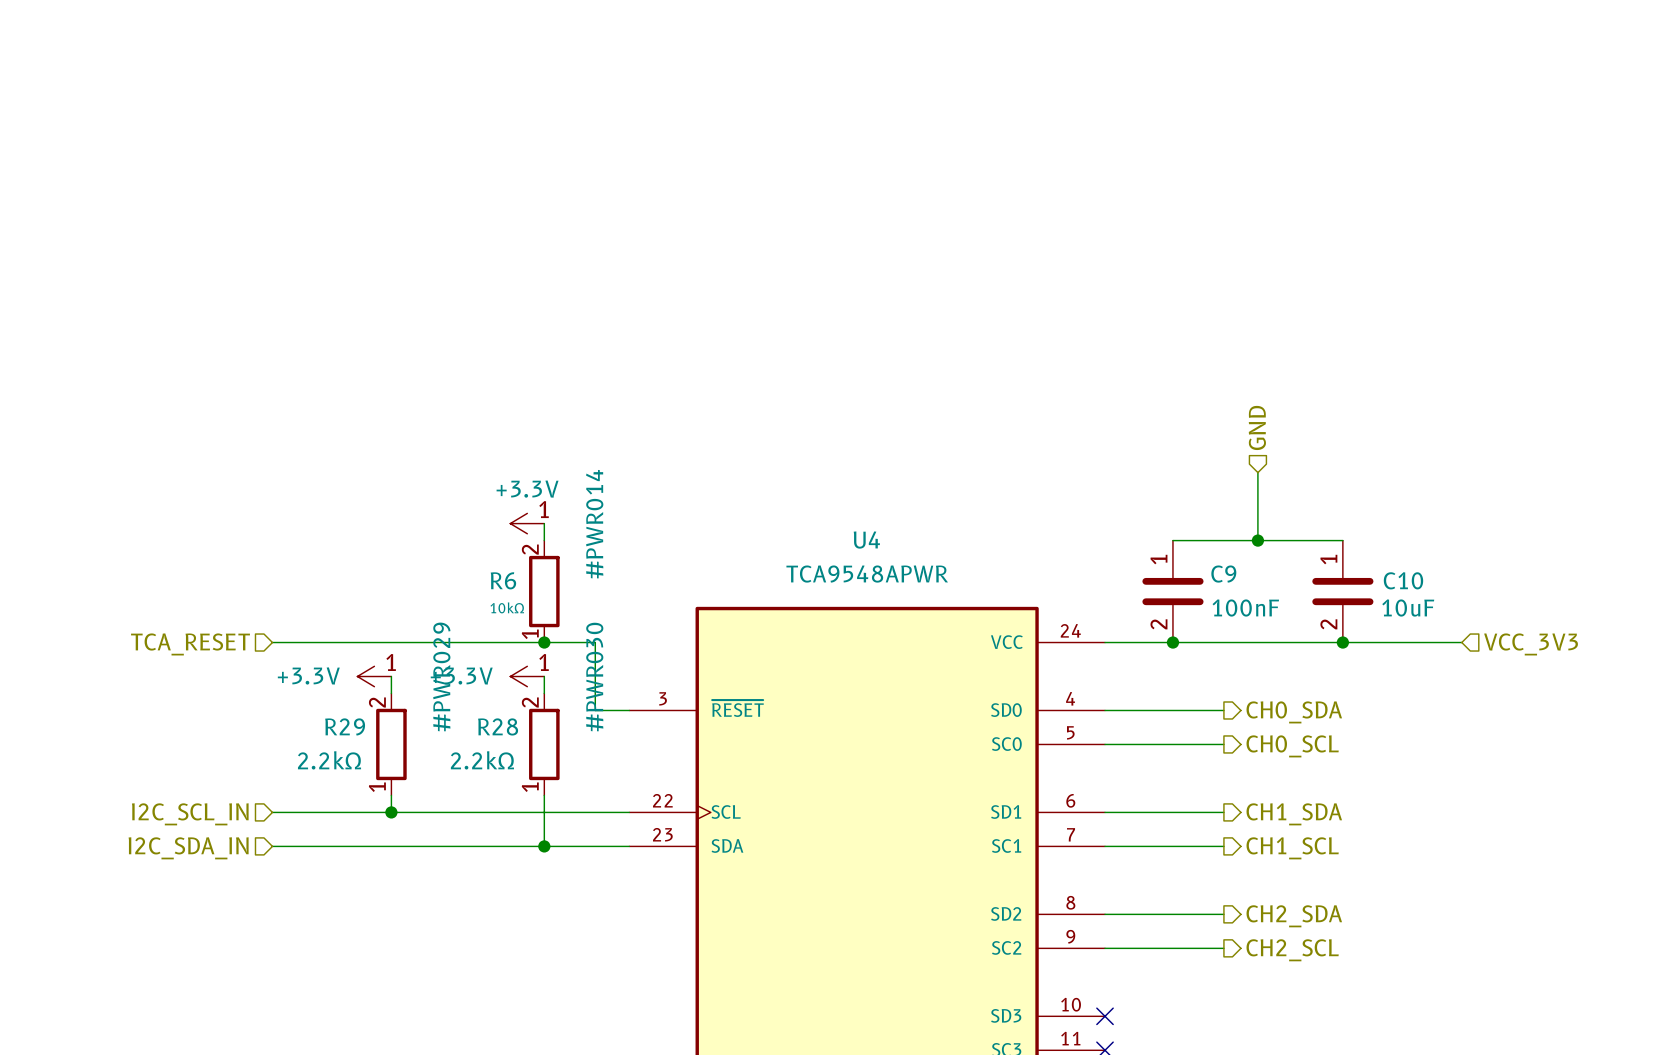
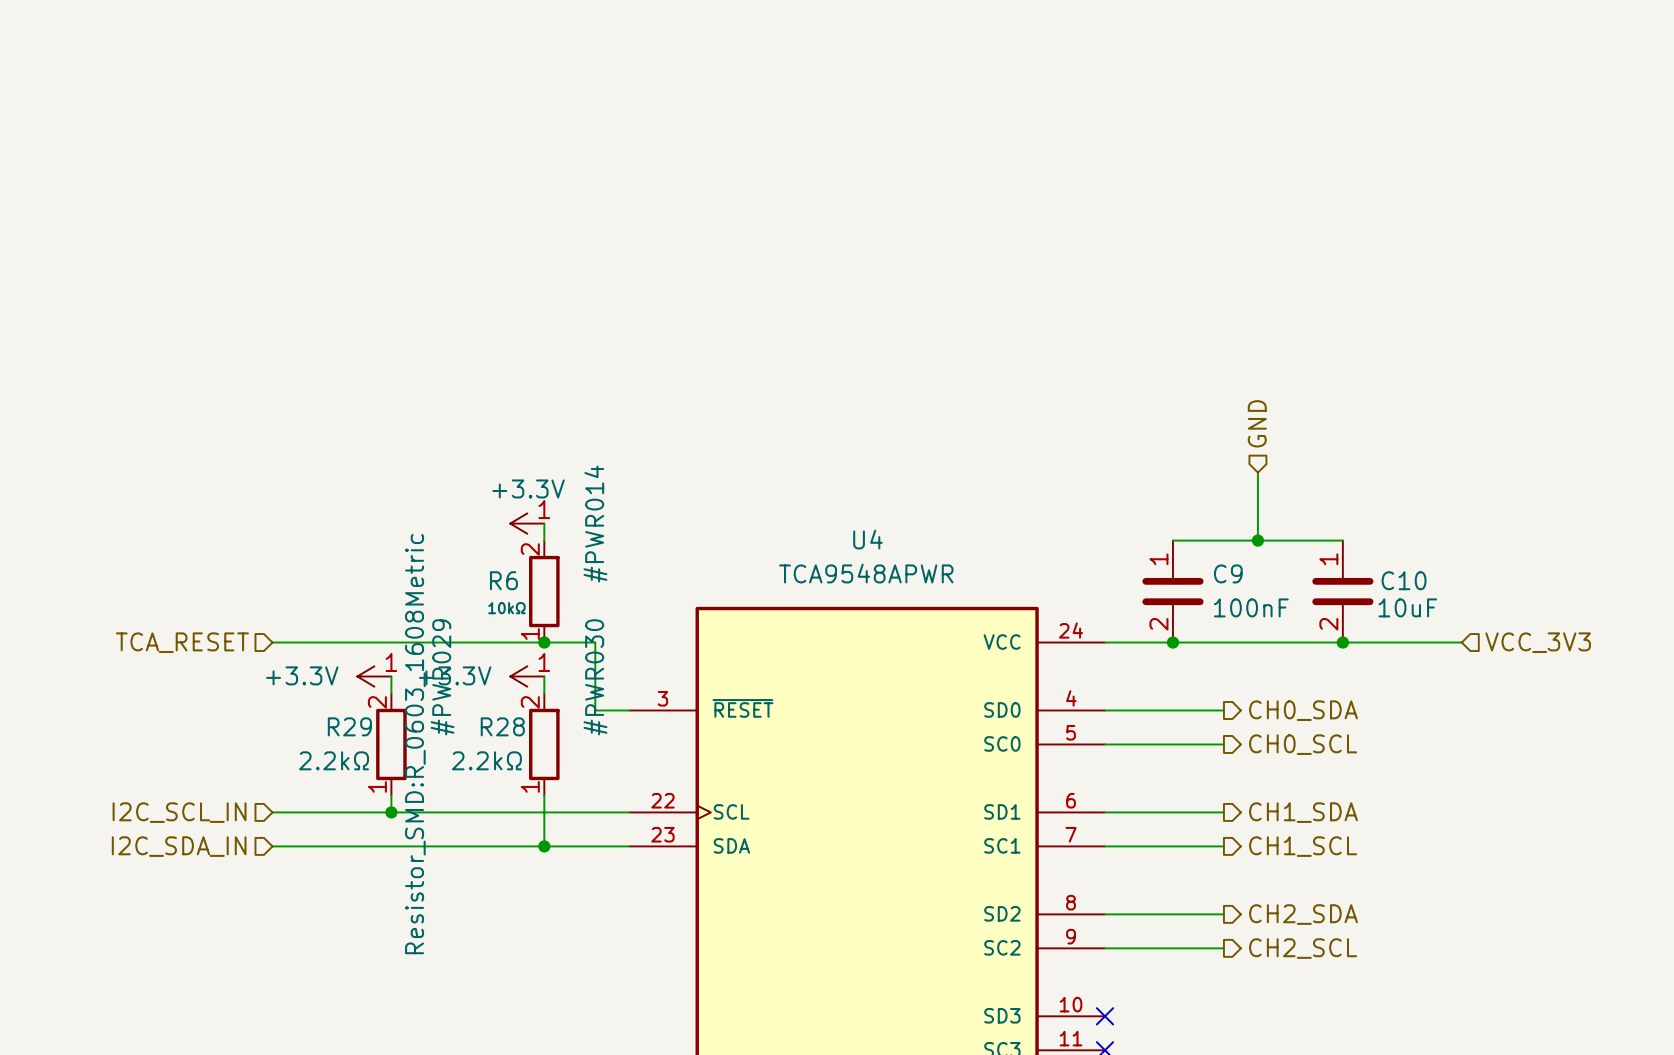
R29 text: none -> Resistor_SMD:R_0603_1608Metric (415, 744)

